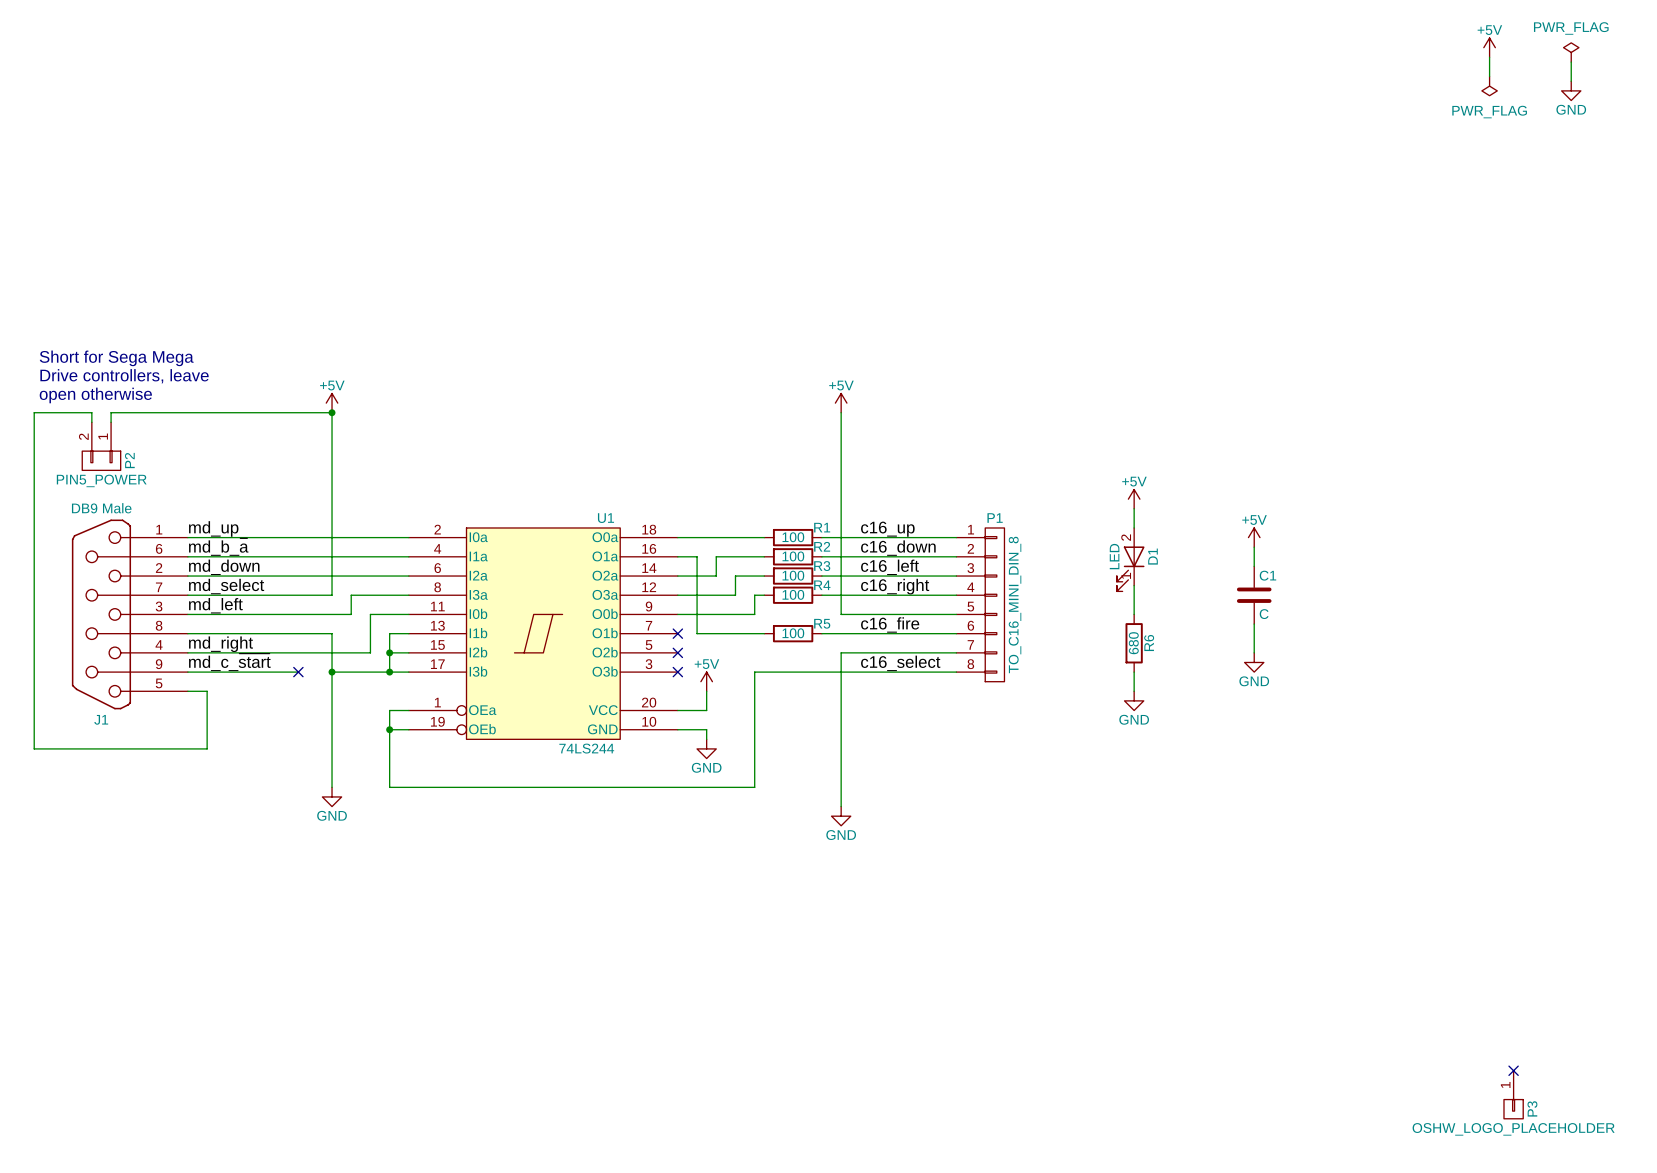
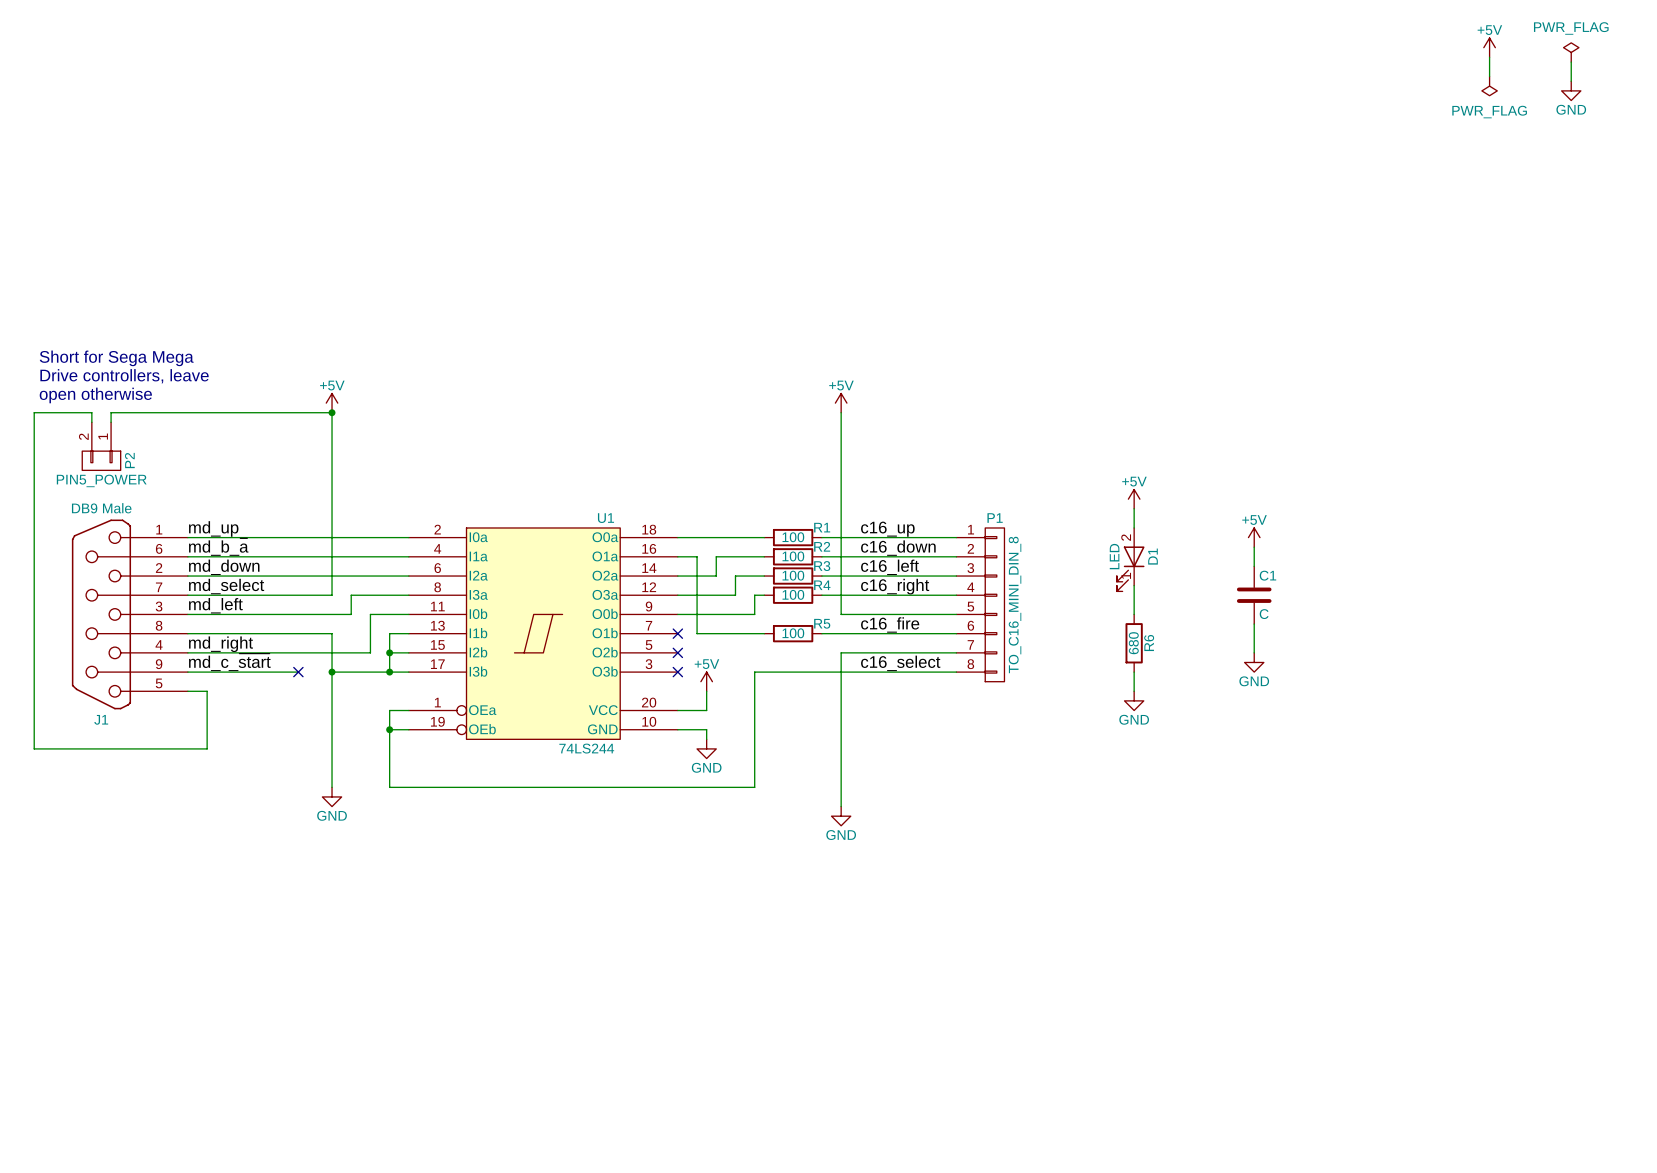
no-connect mark: (1513, 1070) -> none
P3: OSHW_LOGO_PLACEHOLDER (1513, 1094) -> none

